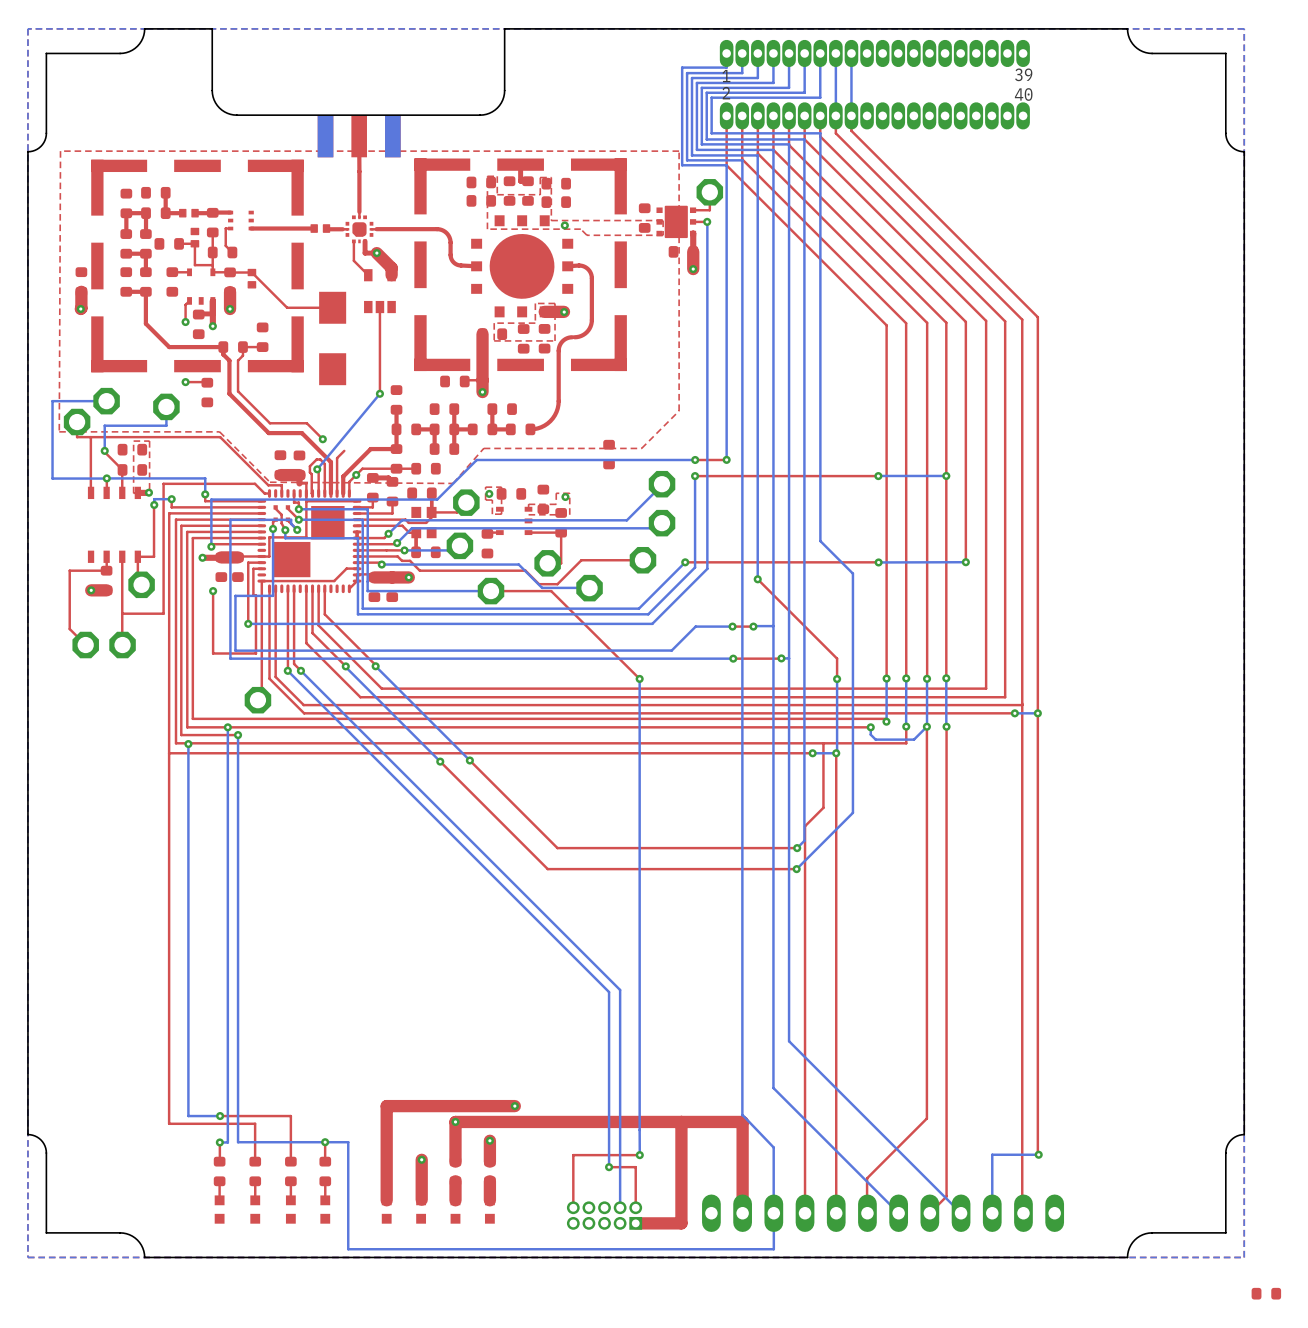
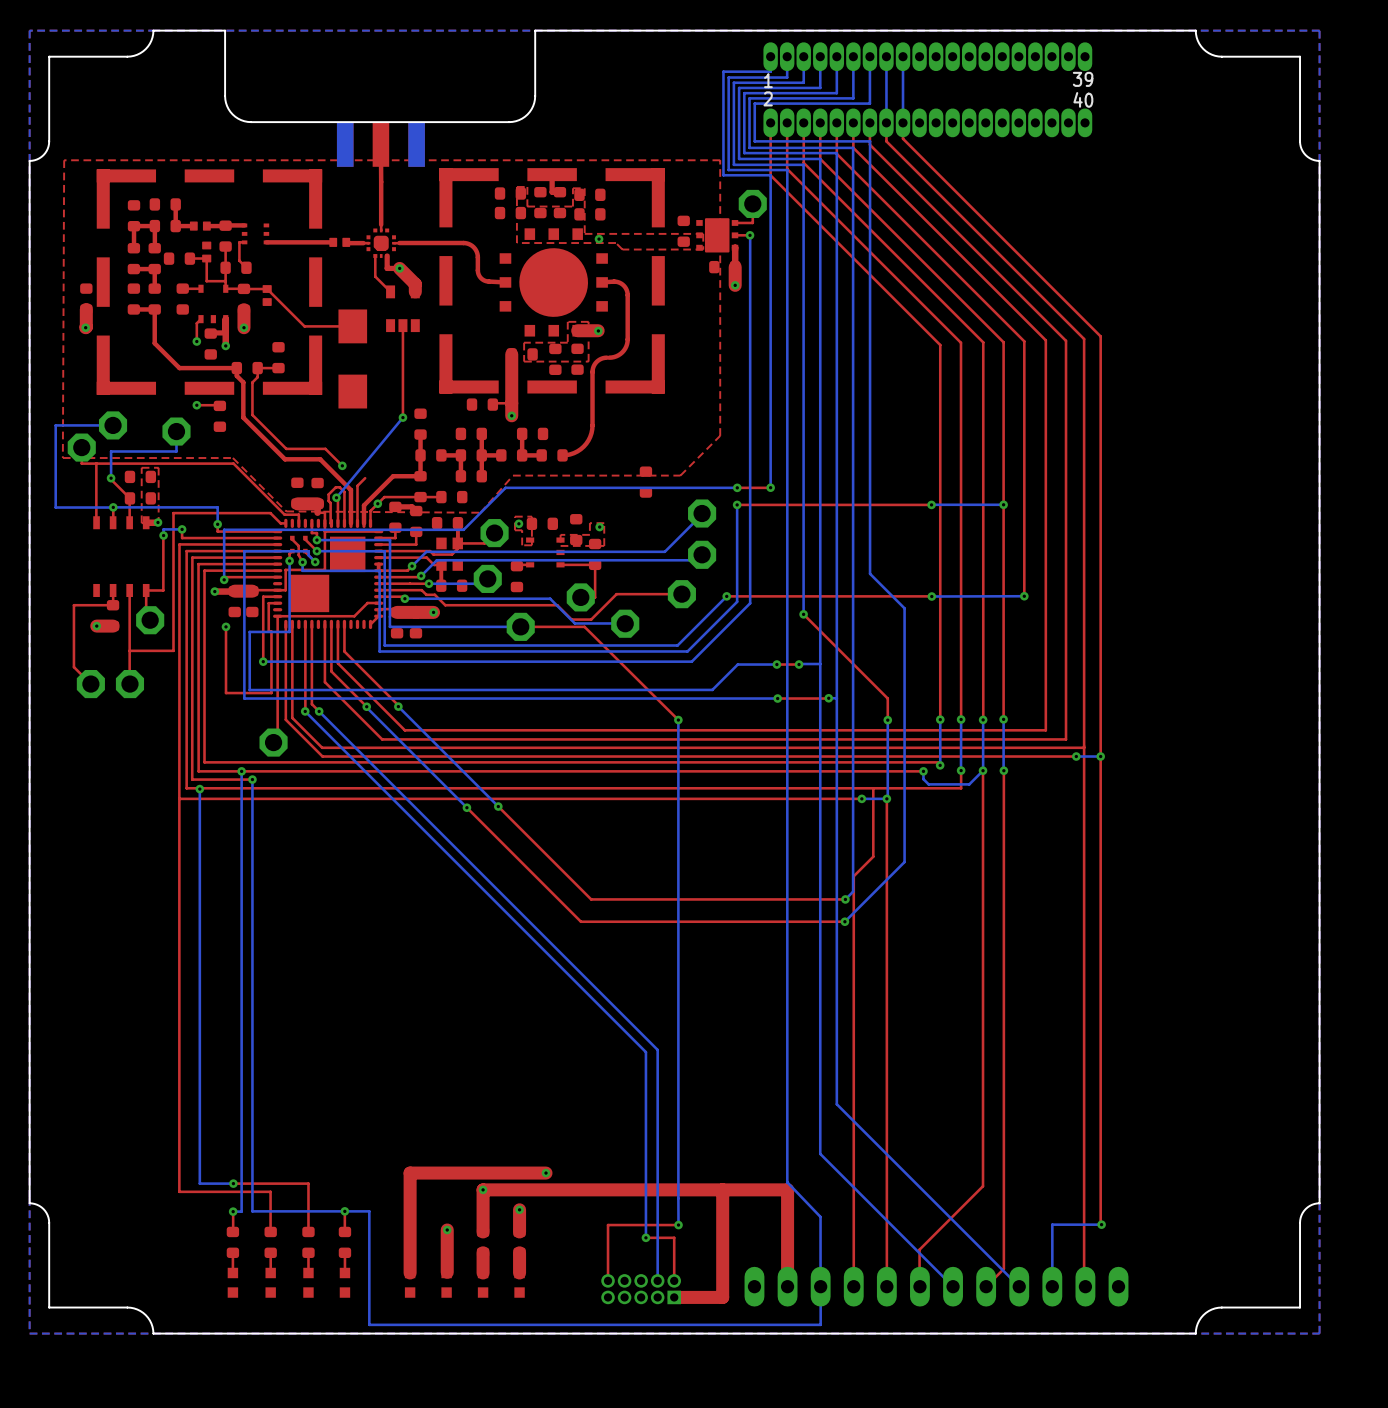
part: (1266, 1293) -> none

